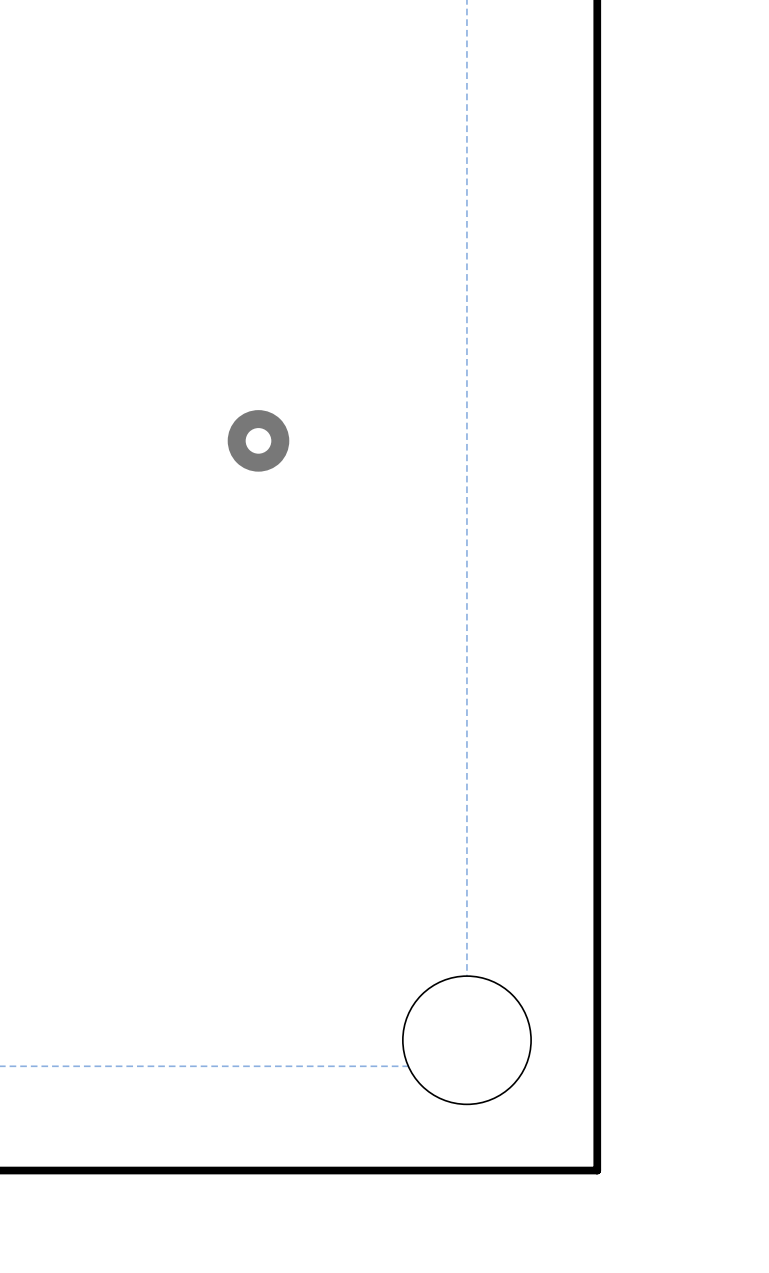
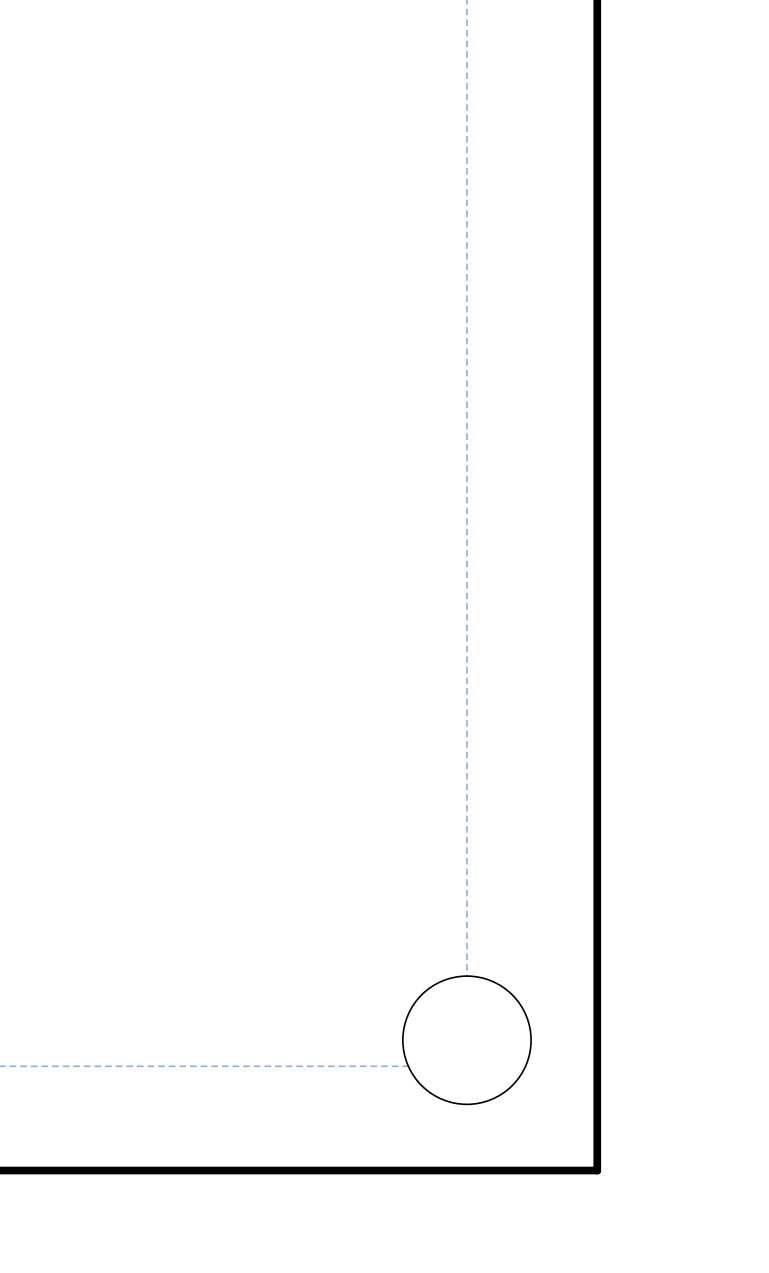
via: (258, 440) -> none

